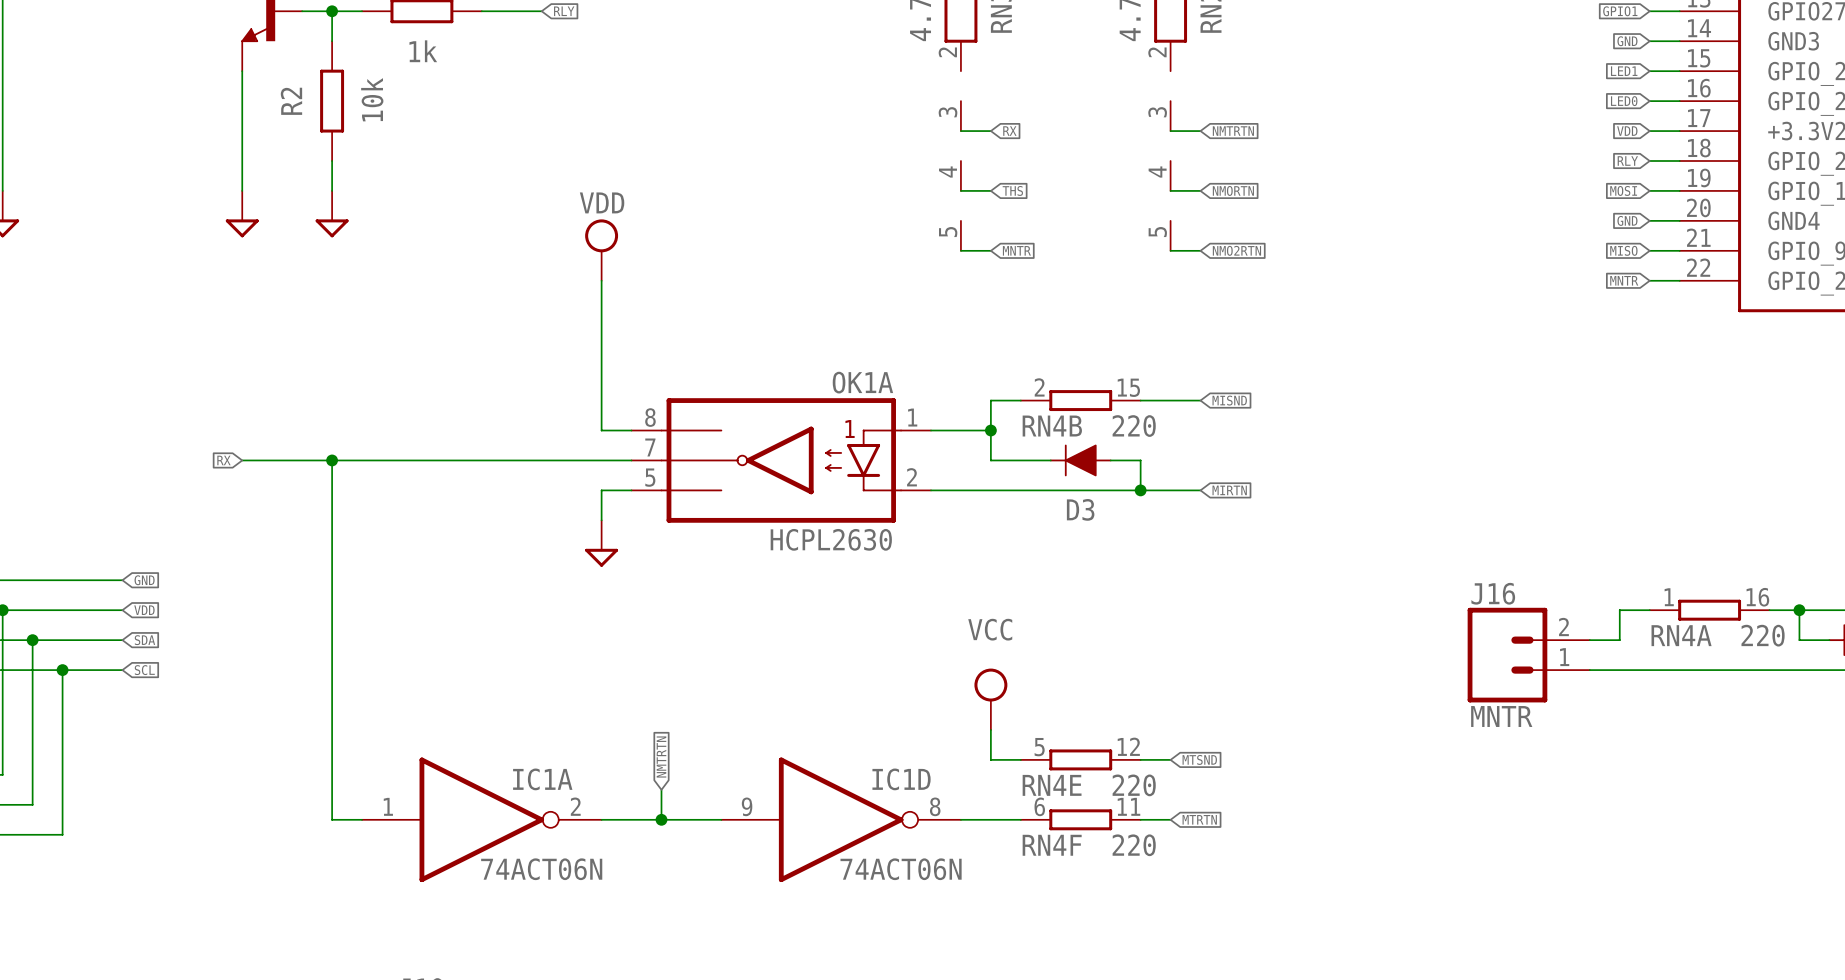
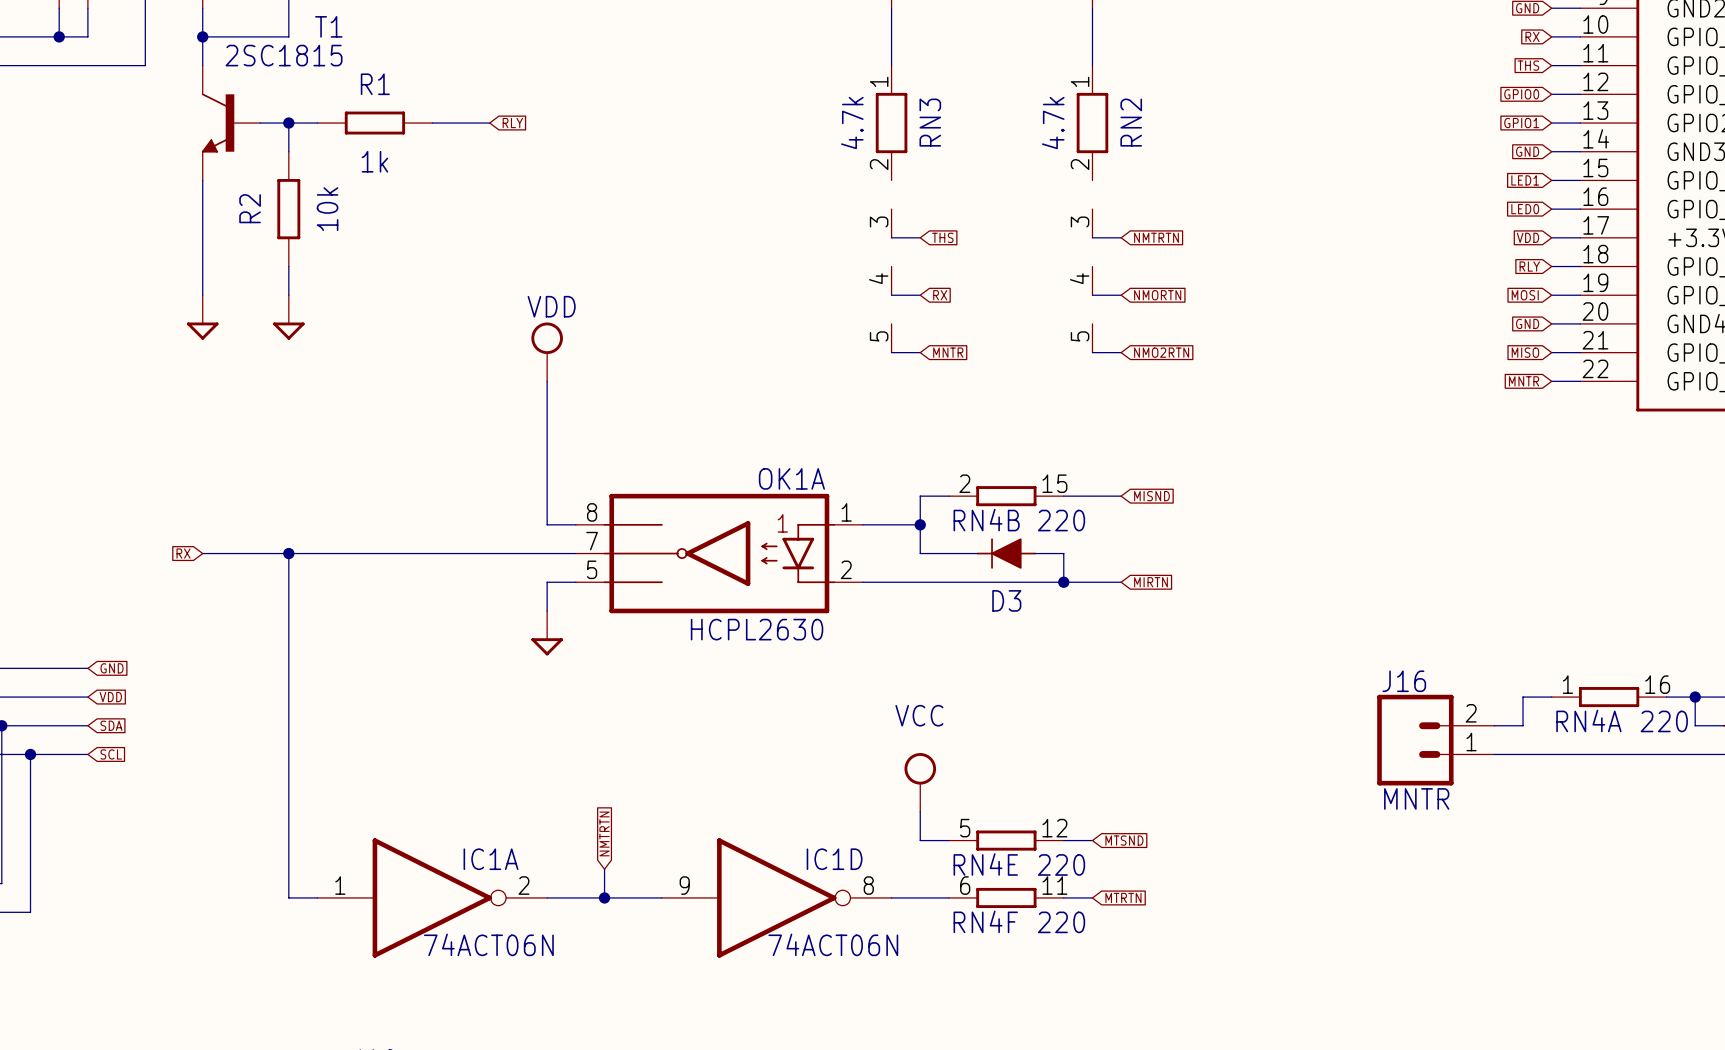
global label: RX (1009, 131) -> THS (942, 237)
global label: THS (1012, 190) -> RX (940, 295)

